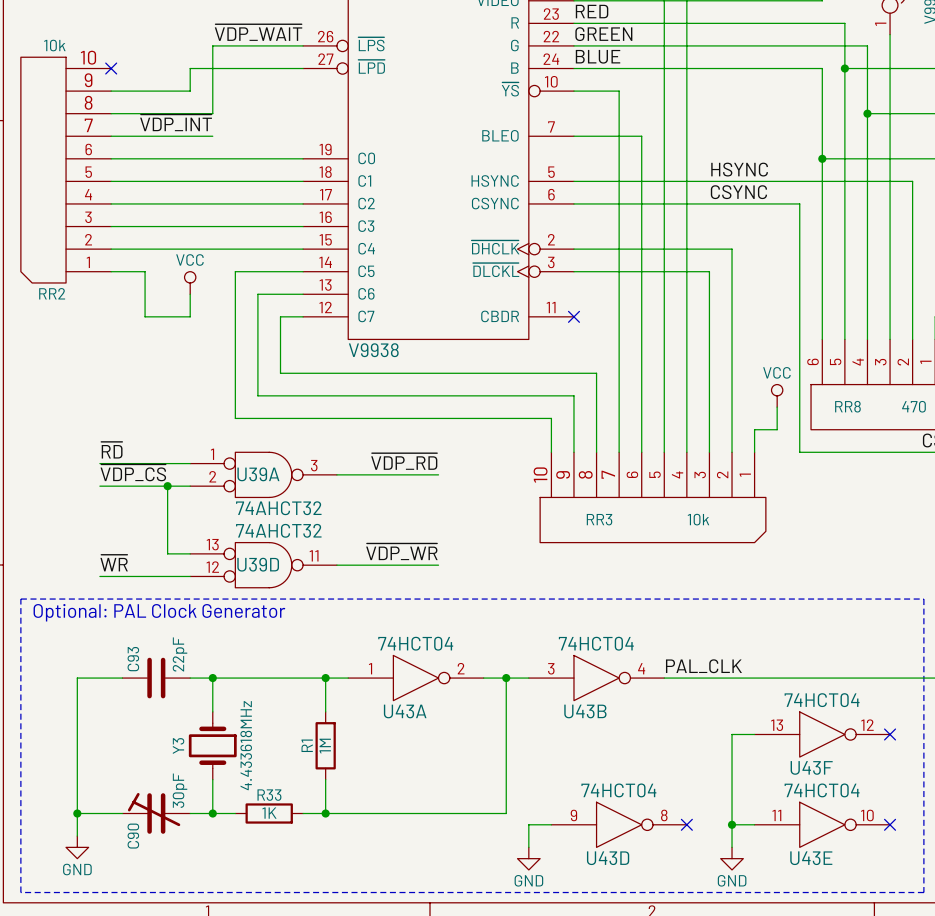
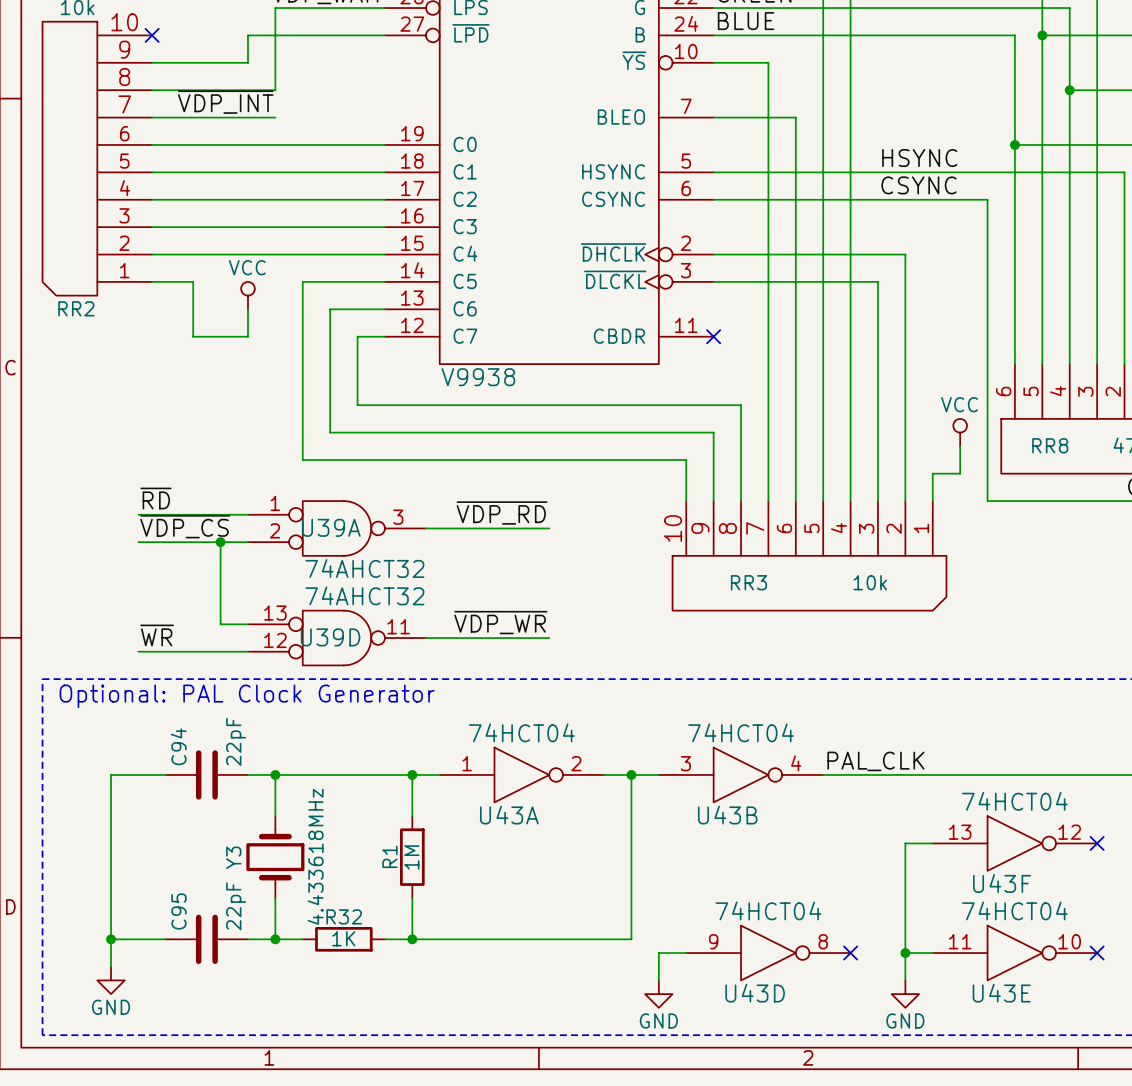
C93 name: C93 (133, 659) -> C94 (178, 746)
R33 name: R33 (269, 795) -> R32 (344, 916)
C90: 30pF (156, 813) -> none
C95: none -> 22pF (206, 939)

